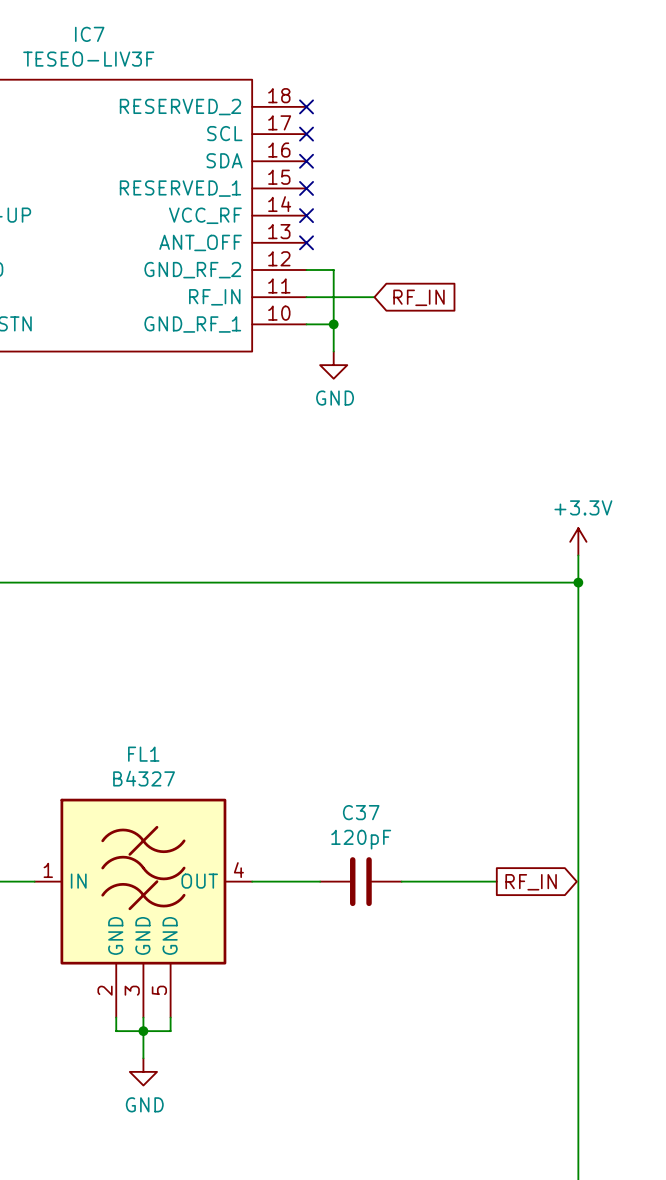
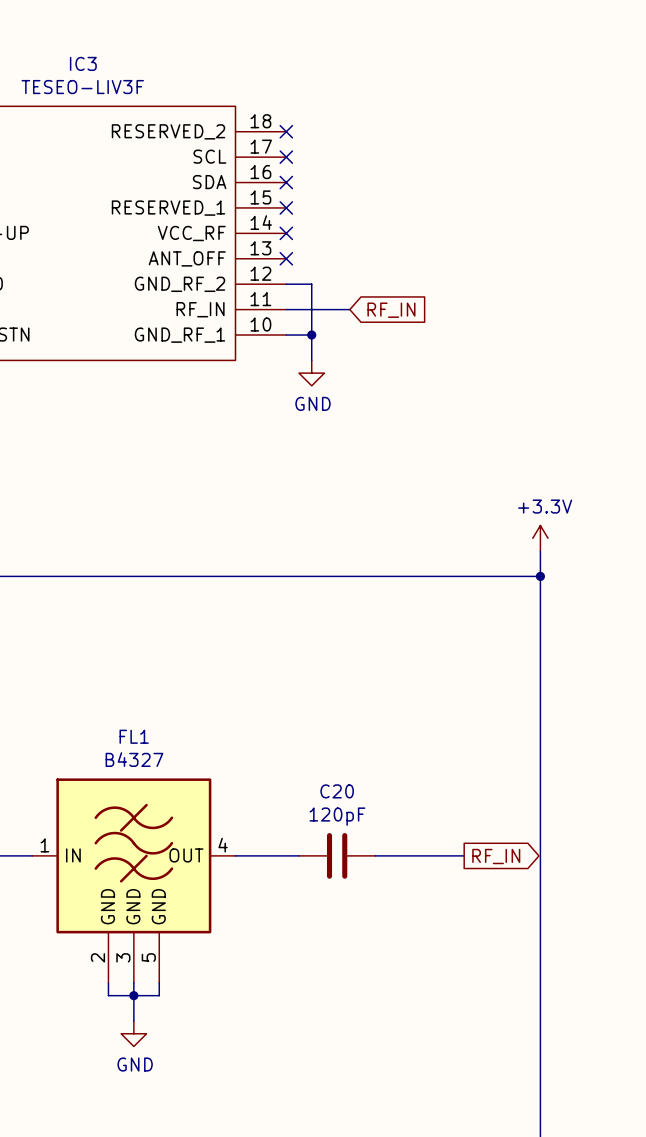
IC7 name: IC7 (89, 34) -> IC3 (83, 63)
C37 name: C37 (361, 812) -> C20 (337, 791)

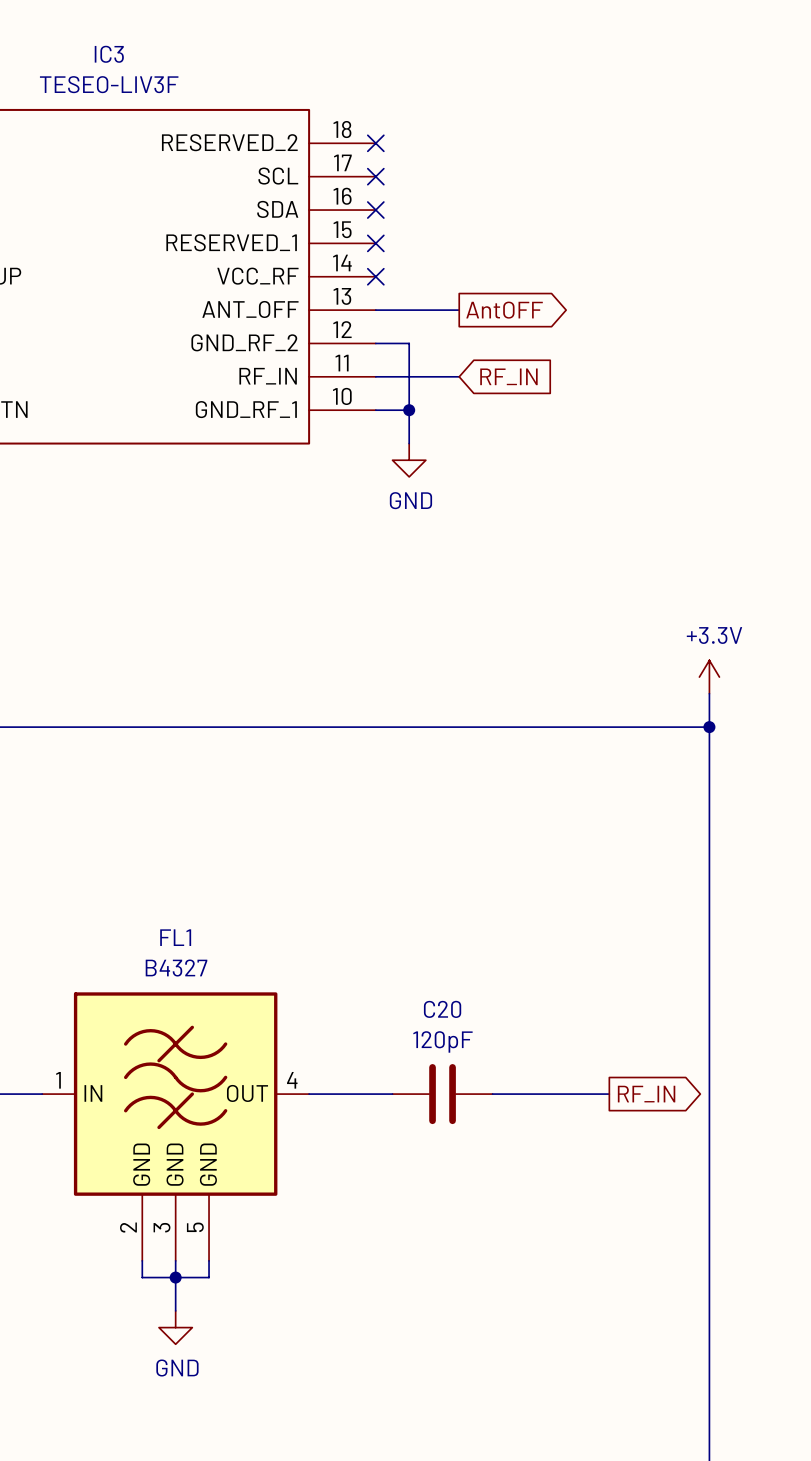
wire: none -> (375, 310) (459, 310)
no-connect mark: (286, 258) -> none
global label: none -> AntOFF (504, 310)

